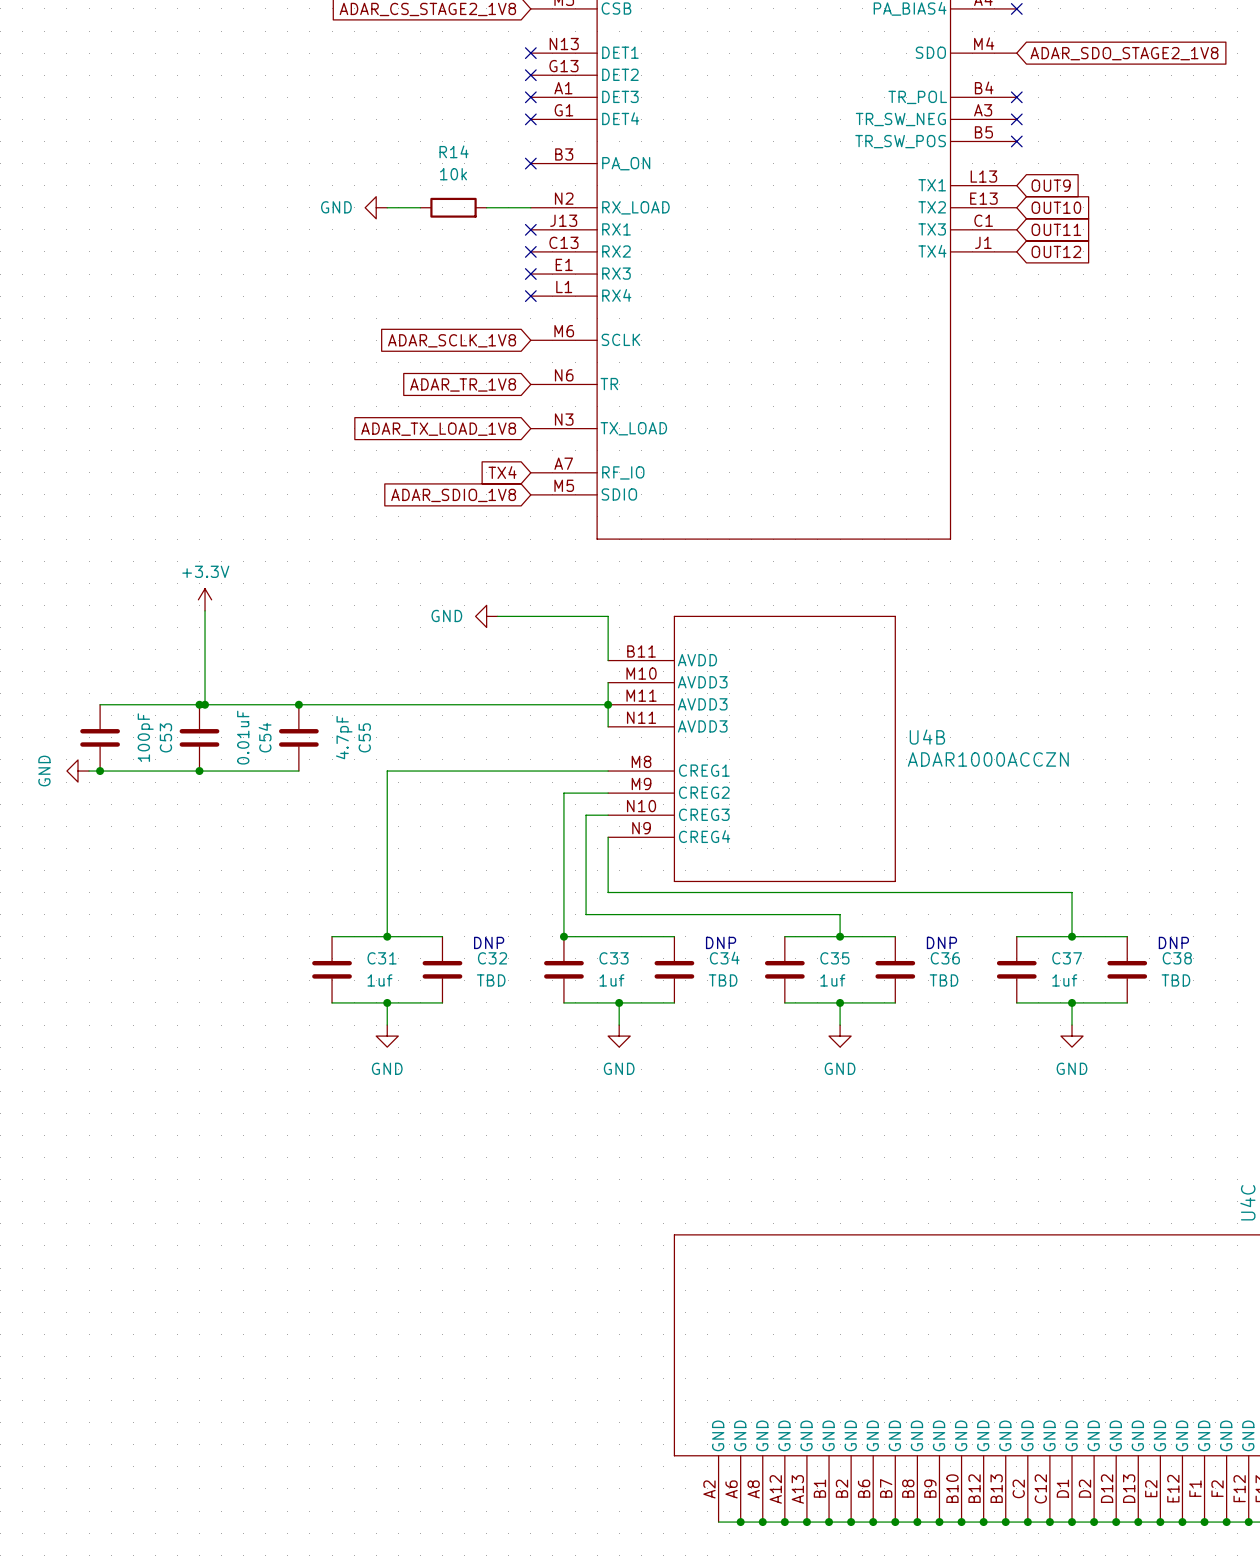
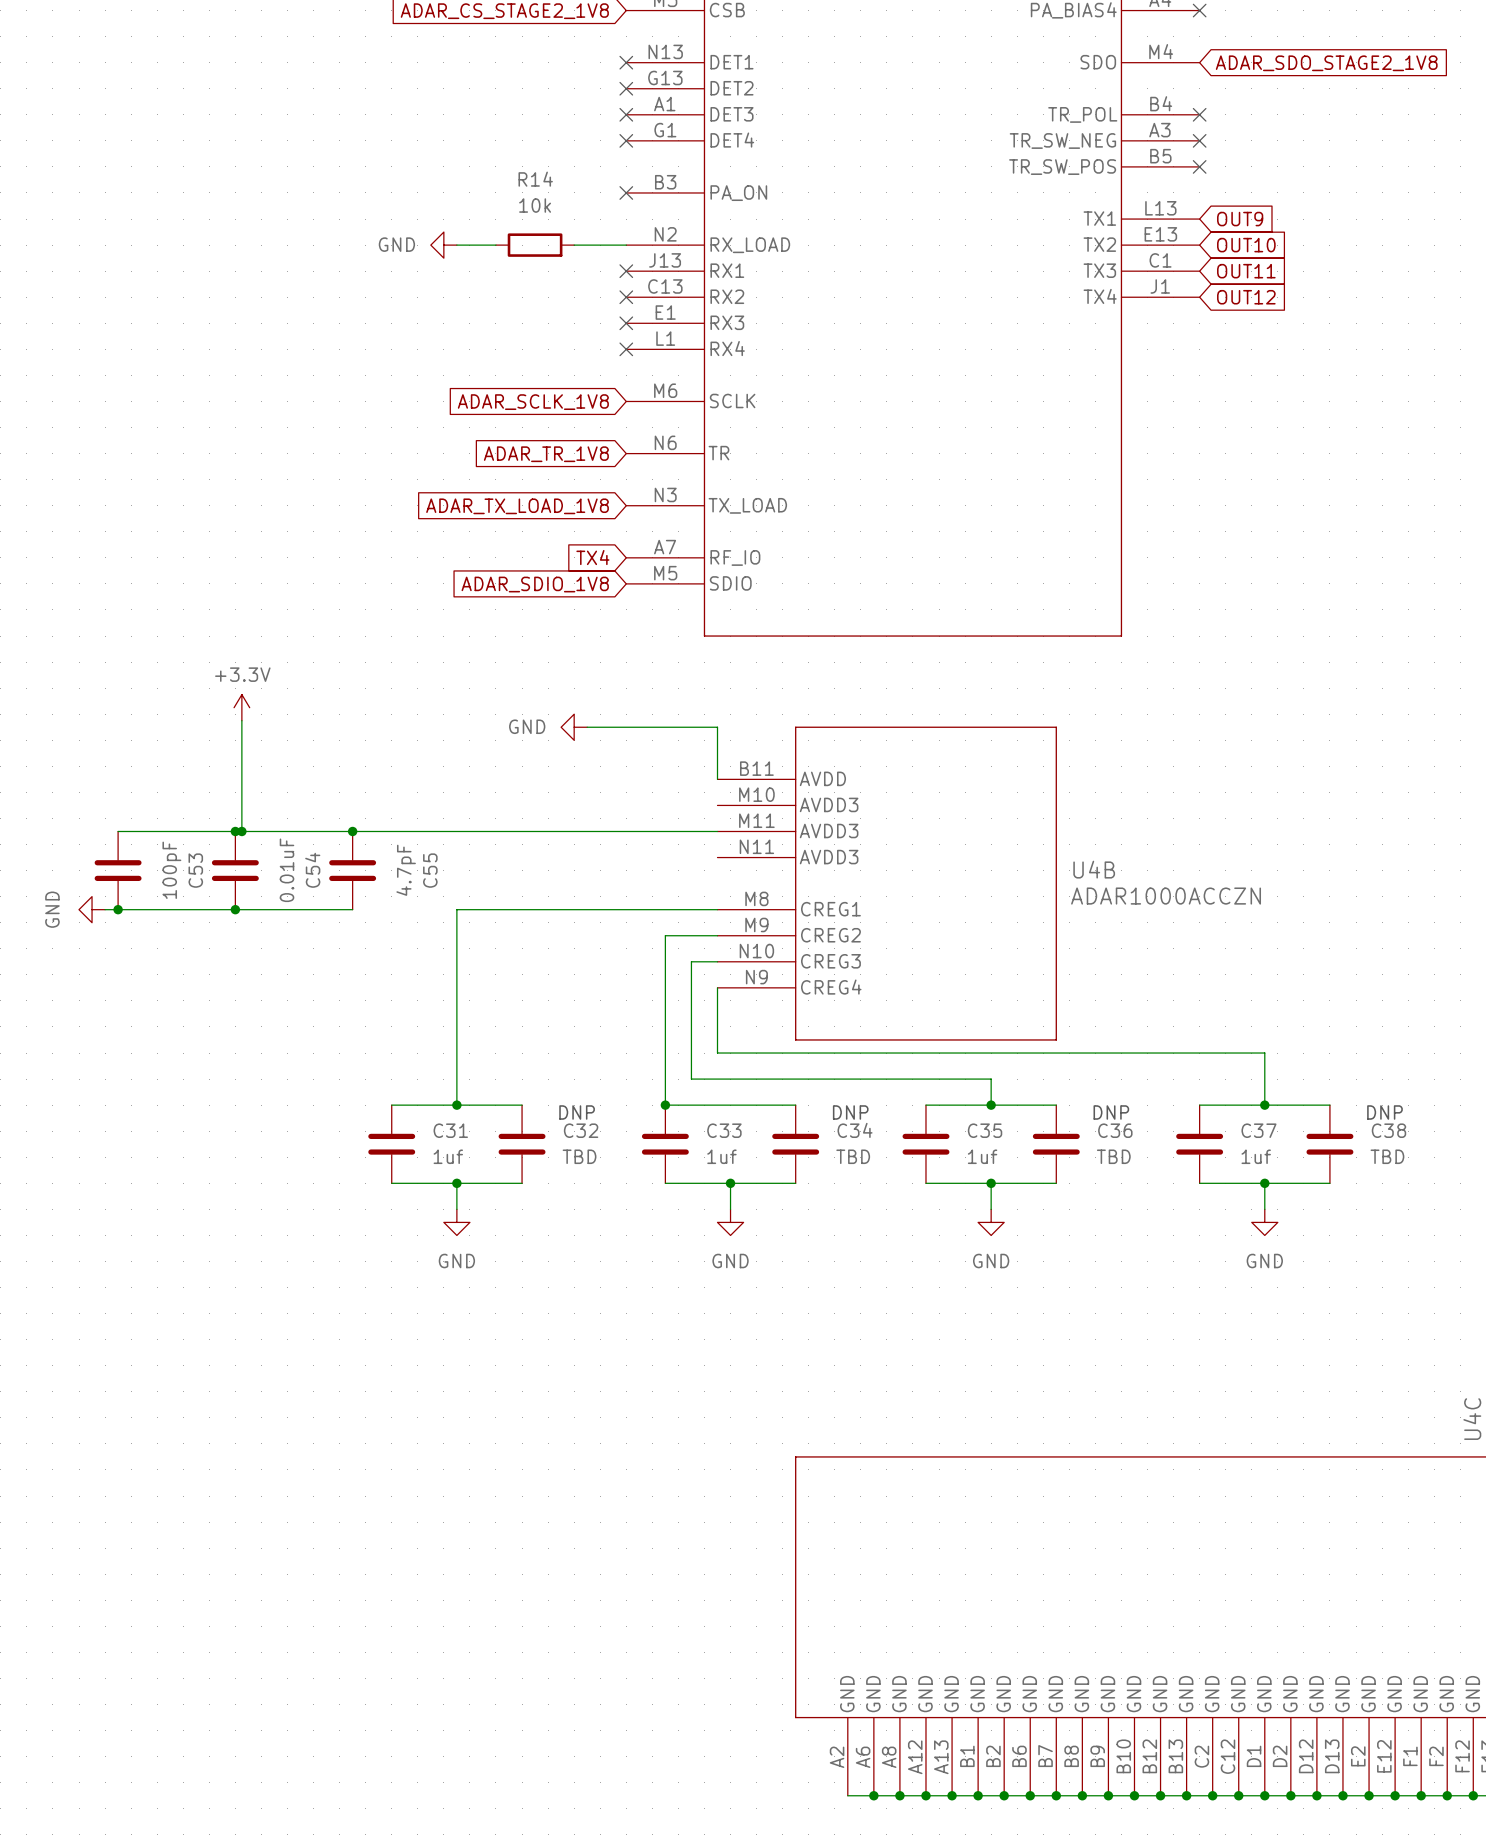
wire: (608, 682) (608, 726) -> none
junction: (608, 704) -> none

